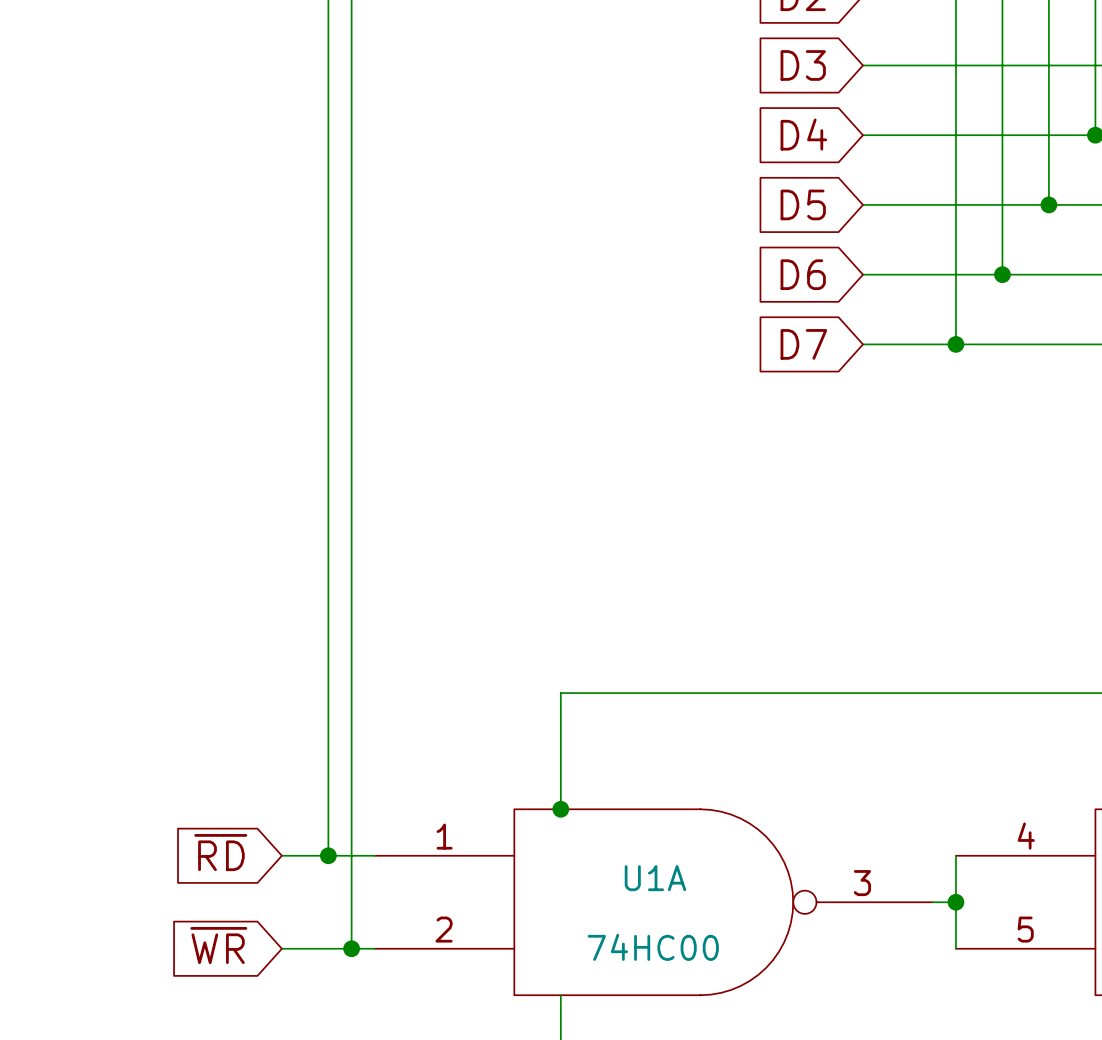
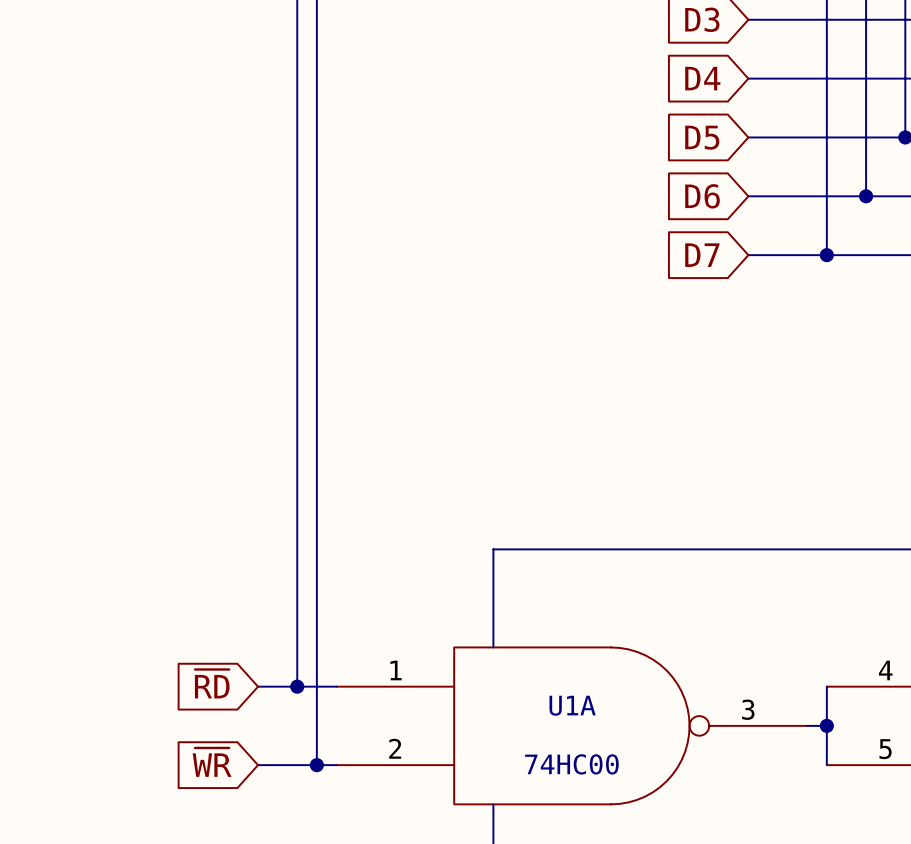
junction: (560, 809) -> none

